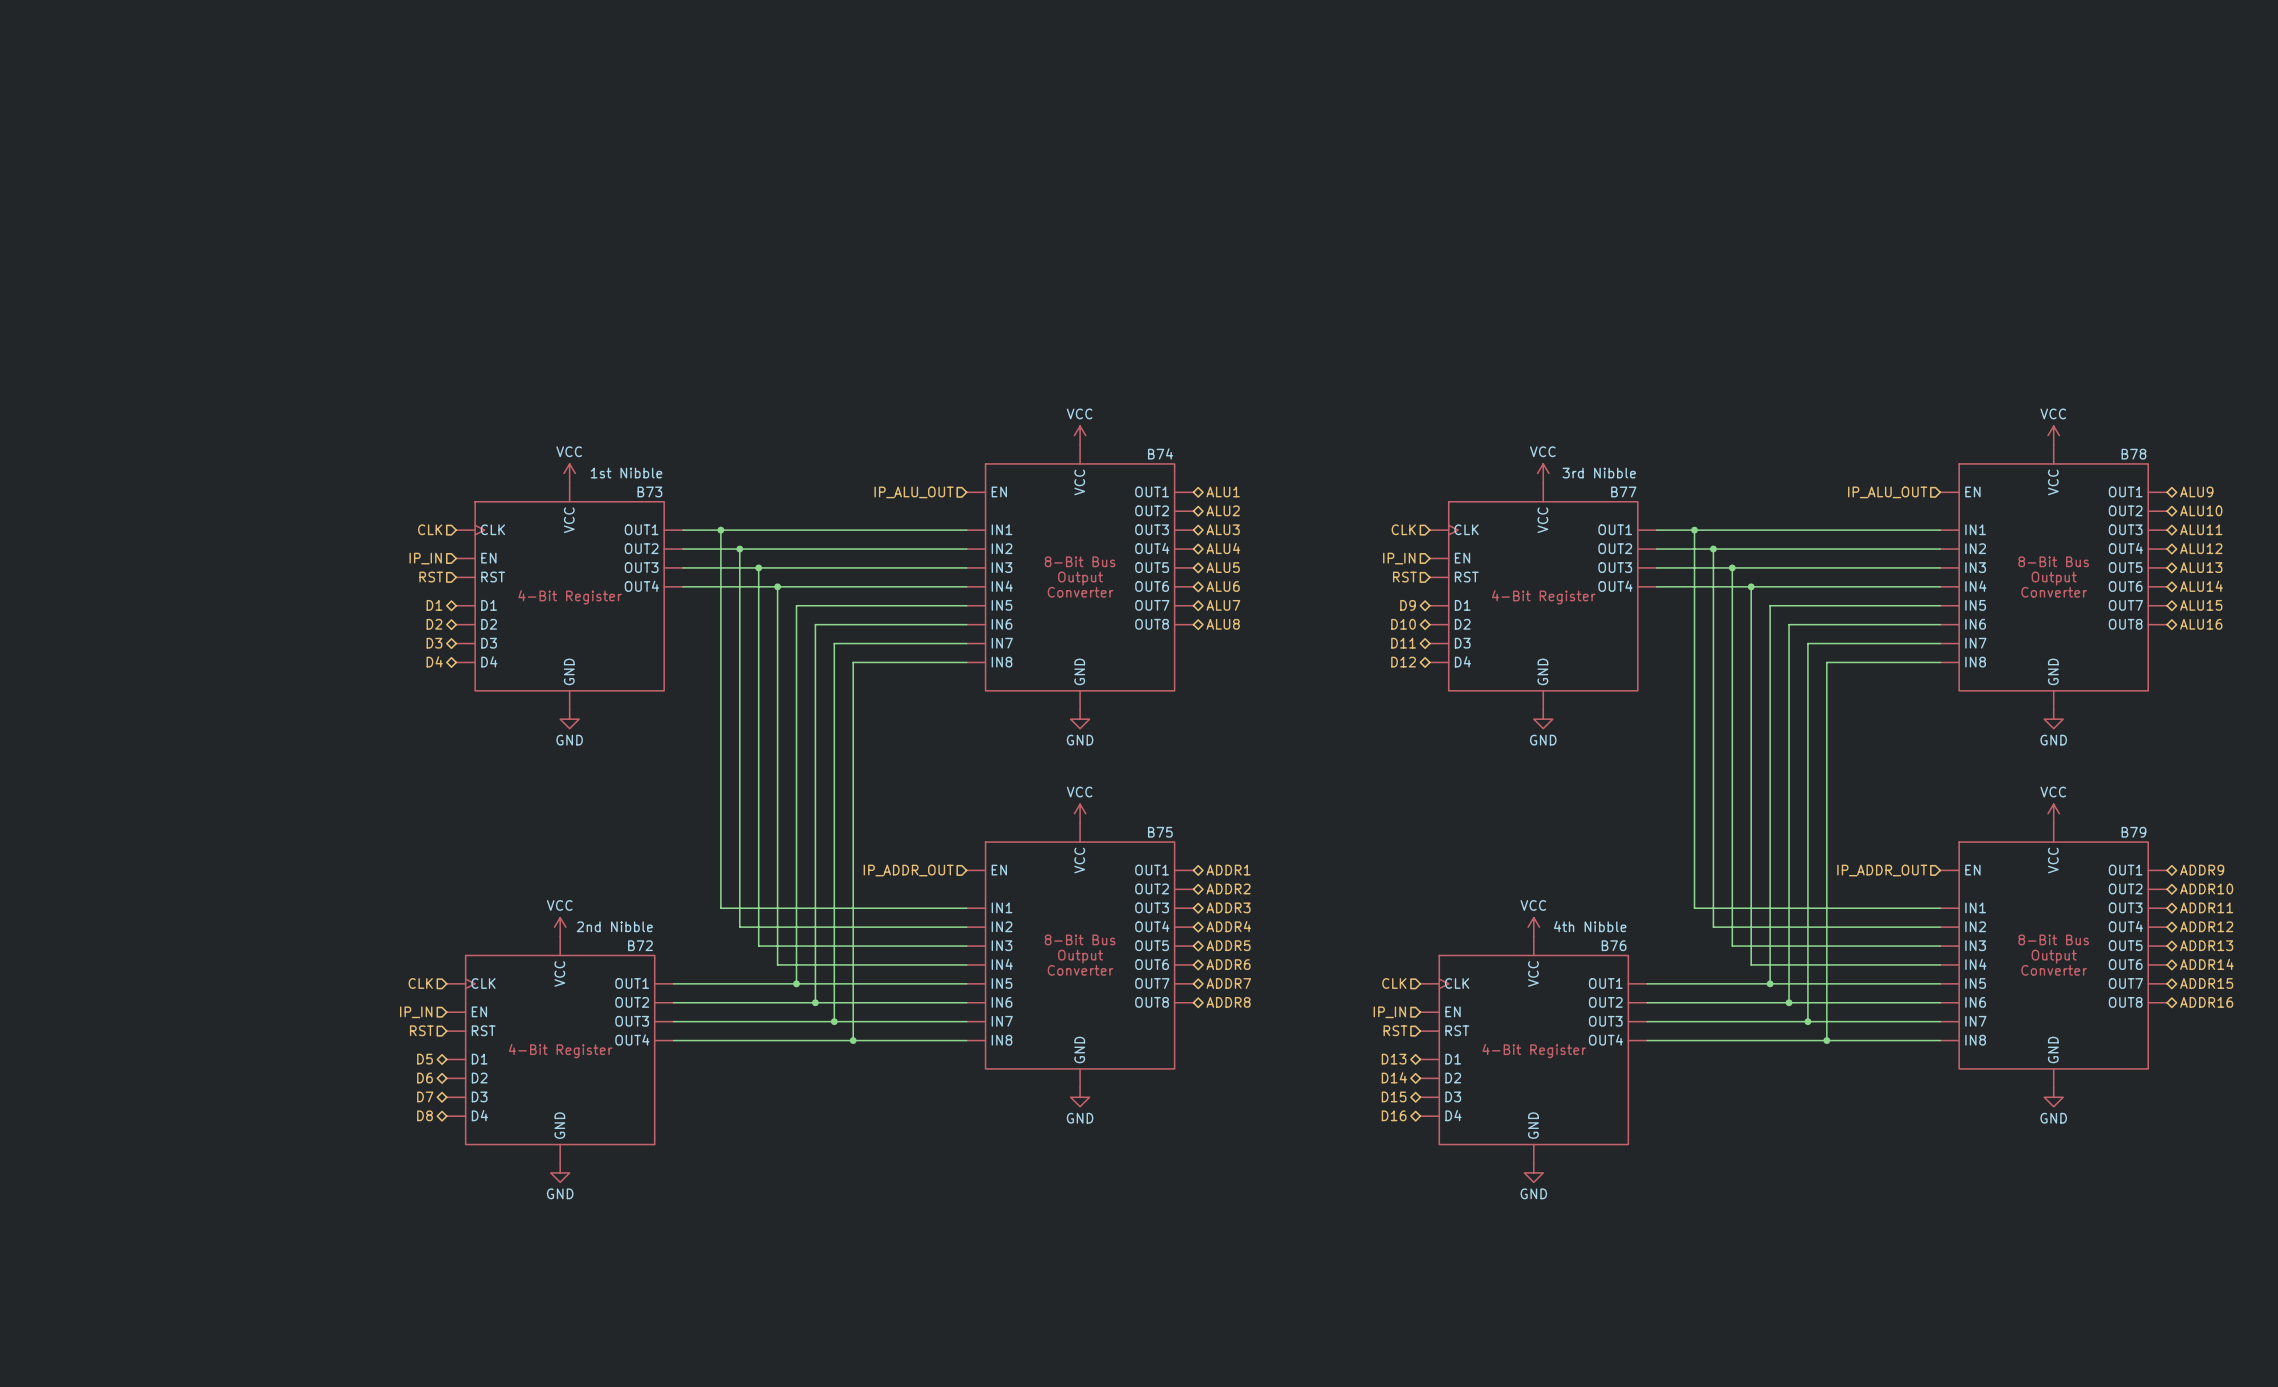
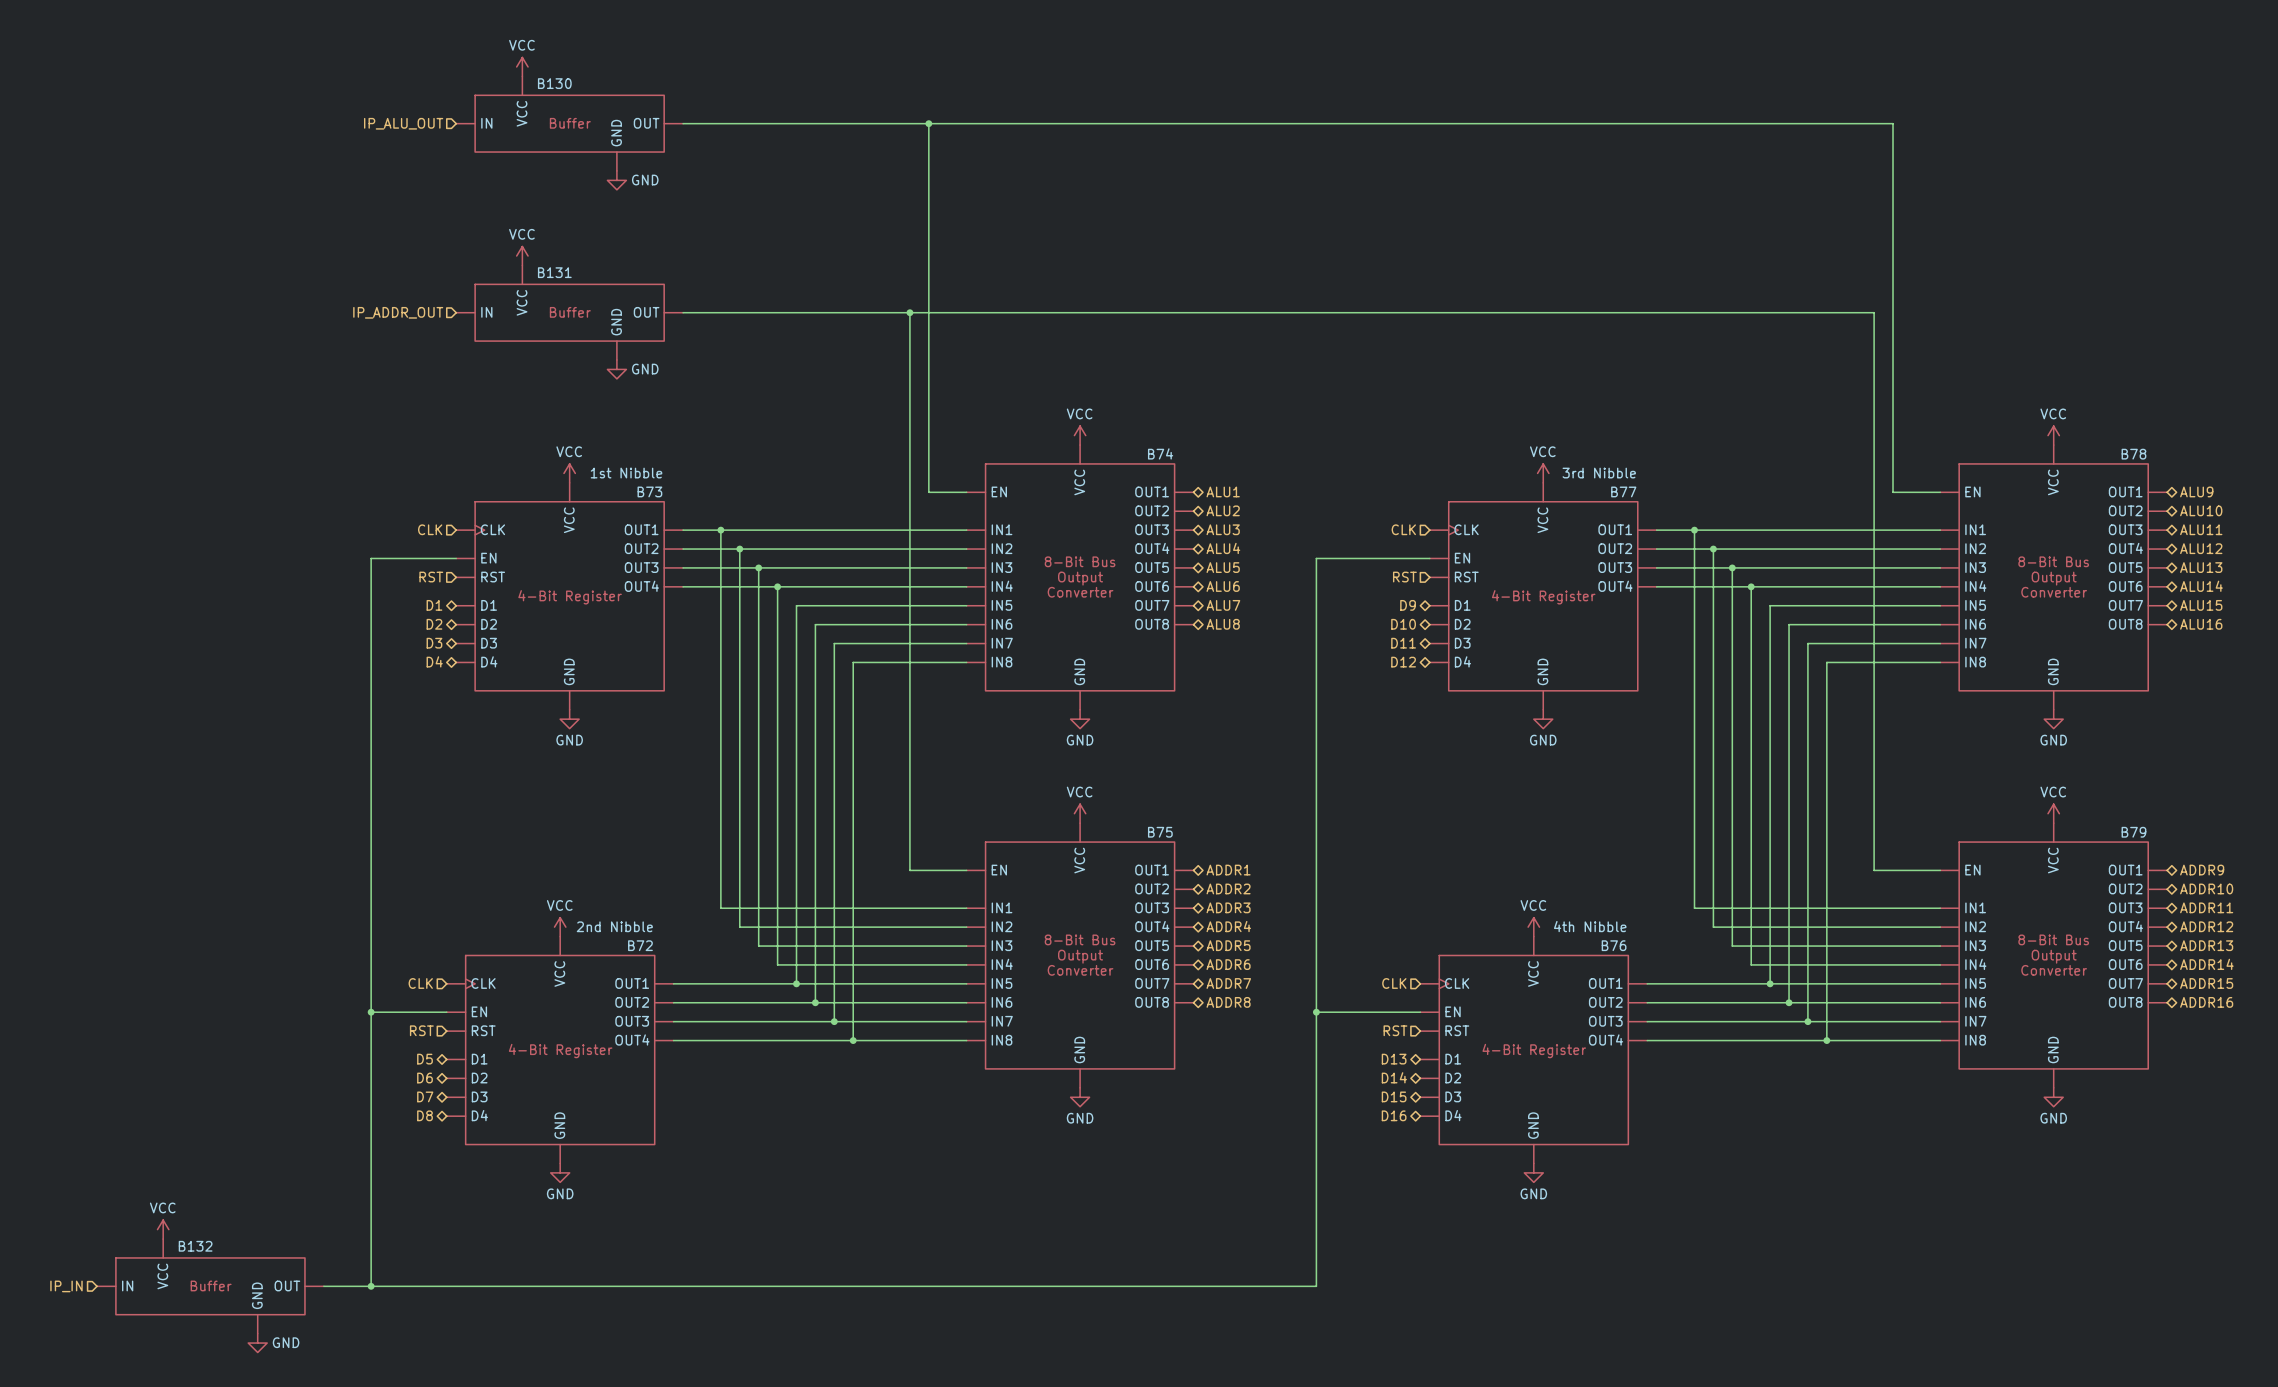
power symbol: none -> VCC (522, 66)
hierarchical label: none -> IP_ALU_OUT (403, 123)
B130: none -> (569, 123)
wire: none -> (683, 123) (1893, 123) (1893, 492) (1940, 492)
wire: none -> (928, 123) (928, 492) (966, 492)
junction: none -> (928, 123)
power symbol: none -> GND (616, 180)
power symbol: none -> VCC (522, 256)
hierarchical label: none -> IP_ADDR_OUT (398, 312)
B131: none -> (569, 312)
wire: none -> (683, 312) (1874, 312) (1874, 870) (1940, 870)
wire: none -> (909, 312) (909, 870) (966, 870)
junction: none -> (909, 312)
power symbol: none -> GND (616, 369)
hierarchical label: IP_ALU_OUT (914, 492) -> none
hierarchical label: IP_ALU_OUT (1887, 492) -> none
hierarchical label: IP_IN (425, 558) -> none
wire: none -> (456, 558) (371, 558) (371, 1286)
hierarchical label: IP_IN (1399, 558) -> none
wire: none -> (1429, 558) (1316, 558) (1316, 1286) (323, 1286)
hierarchical label: IP_ADDR_OUT (908, 870) -> none
hierarchical label: IP_ADDR_OUT (1882, 870) -> none
wire: none -> (371, 1012) (446, 1012)
junction: none -> (371, 1012)
hierarchical label: IP_IN (416, 1012) -> none
wire: none -> (1316, 1012) (1420, 1012)
junction: none -> (1316, 1012)
hierarchical label: IP_IN (1389, 1012) -> none
power symbol: none -> VCC (163, 1229)
hierarchical label: none -> IP_IN (66, 1286)
B132: none -> (210, 1286)
junction: none -> (371, 1286)
power symbol: none -> GND (257, 1343)

